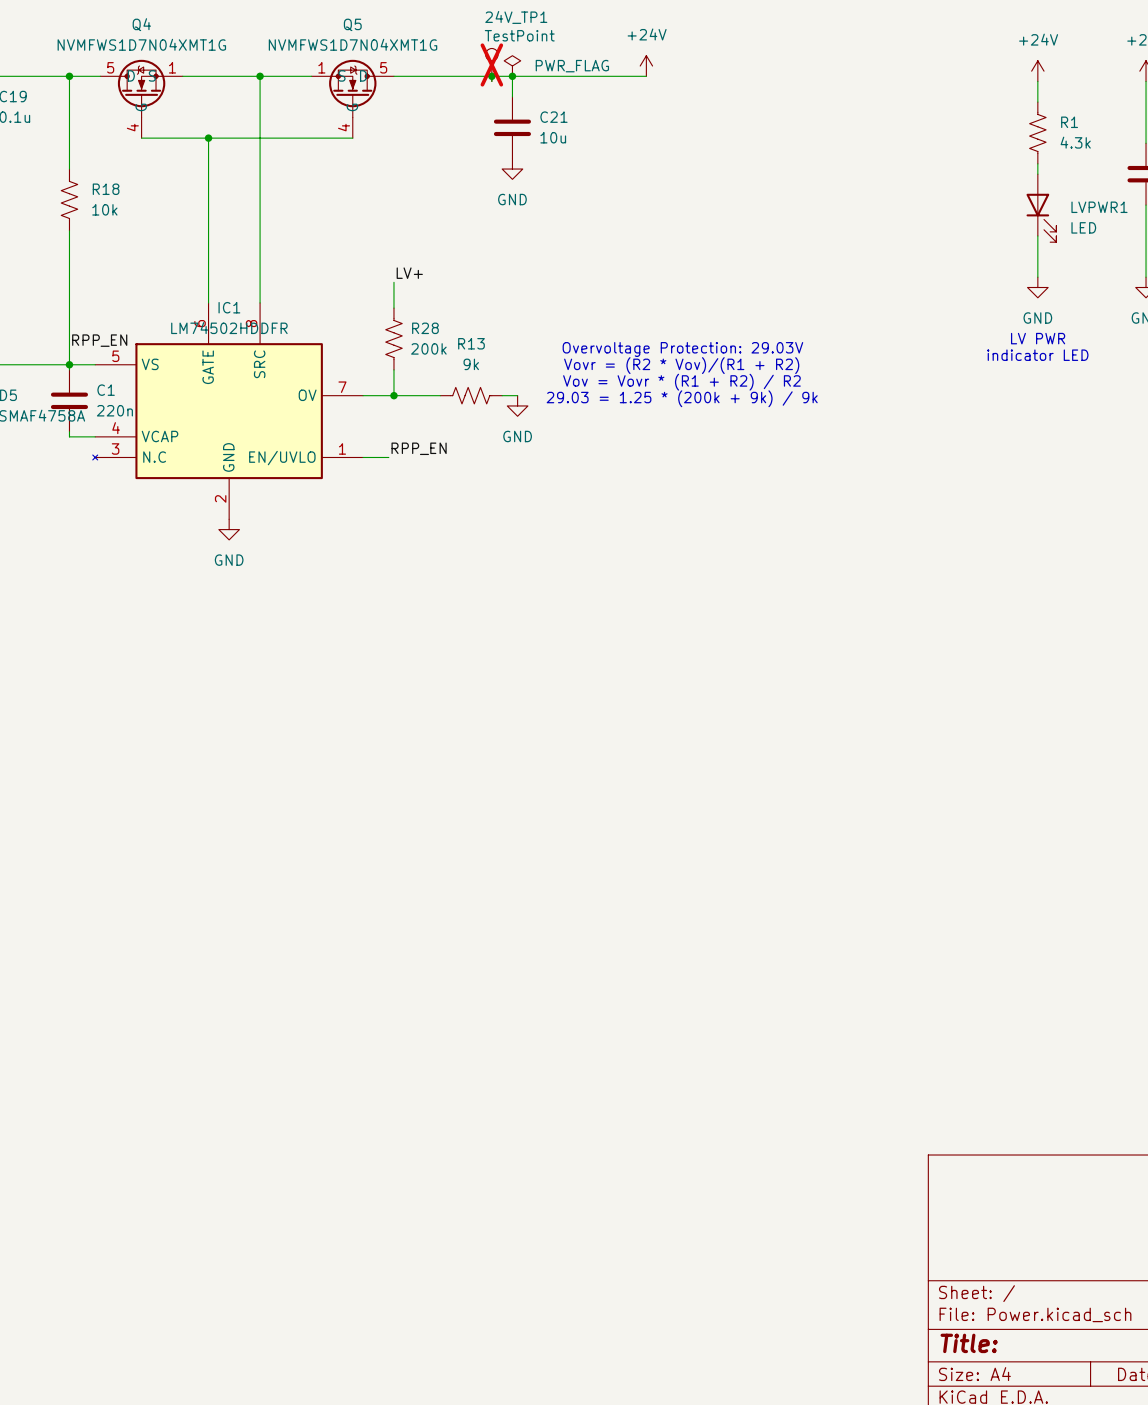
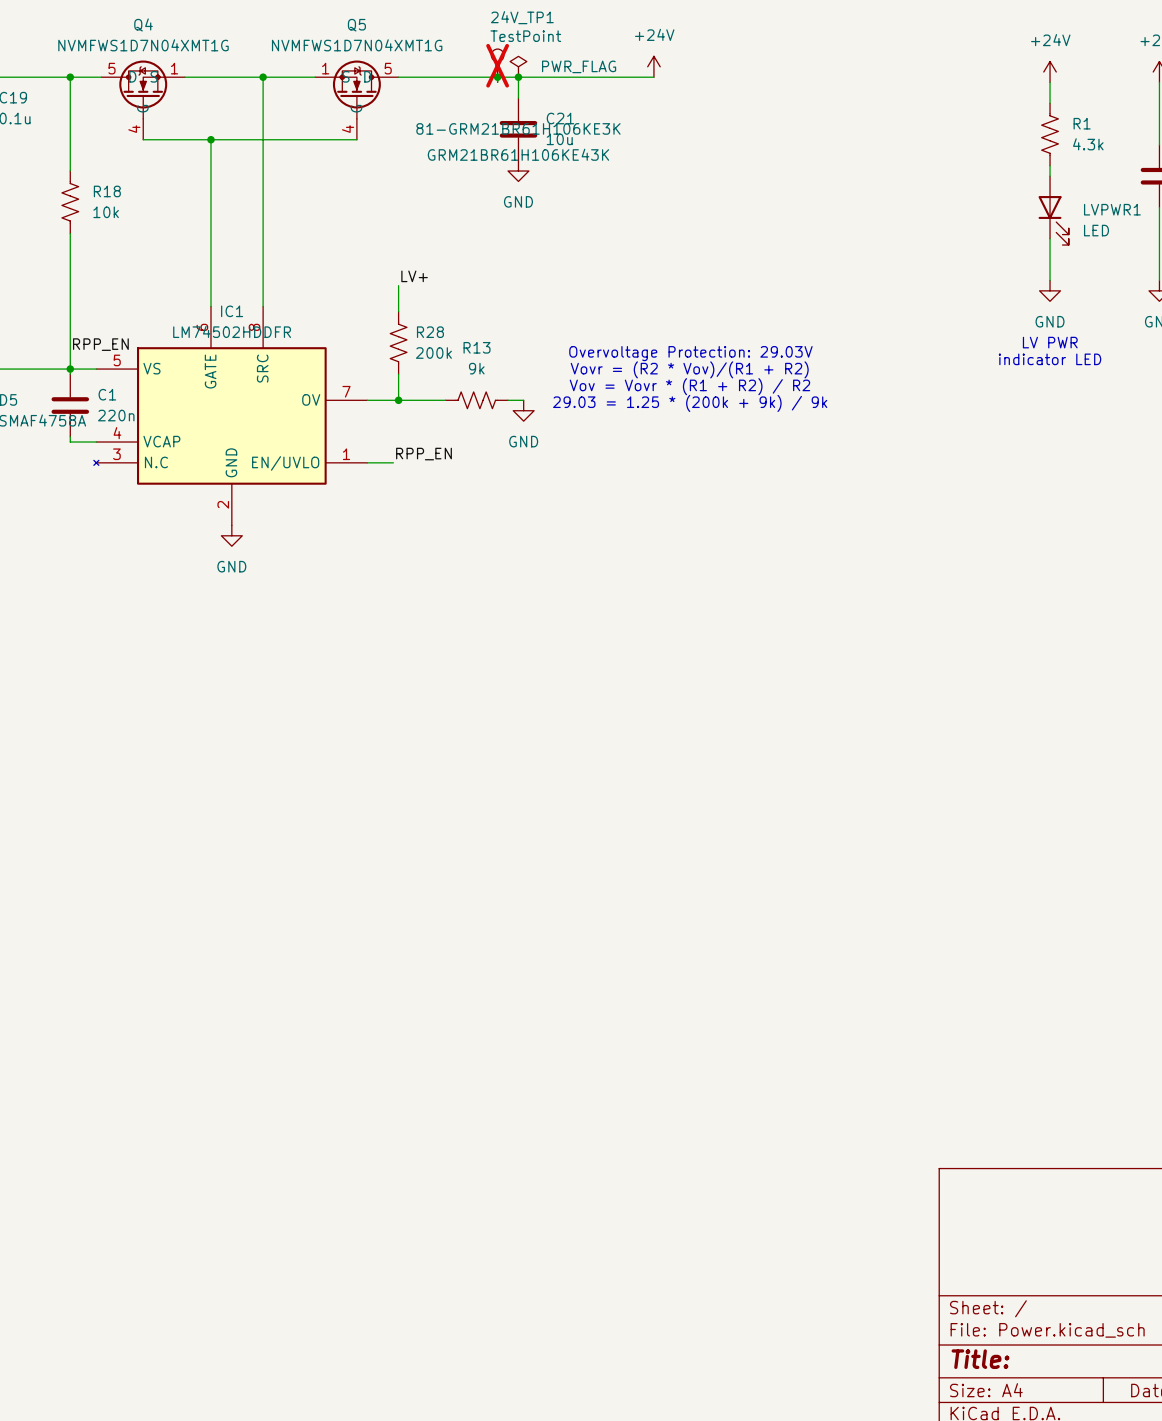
C21 text: none -> 81-GRM21BR61H106KE3K (518, 128)
C21 text: none -> GRM21BR61H106KE43K (518, 154)

